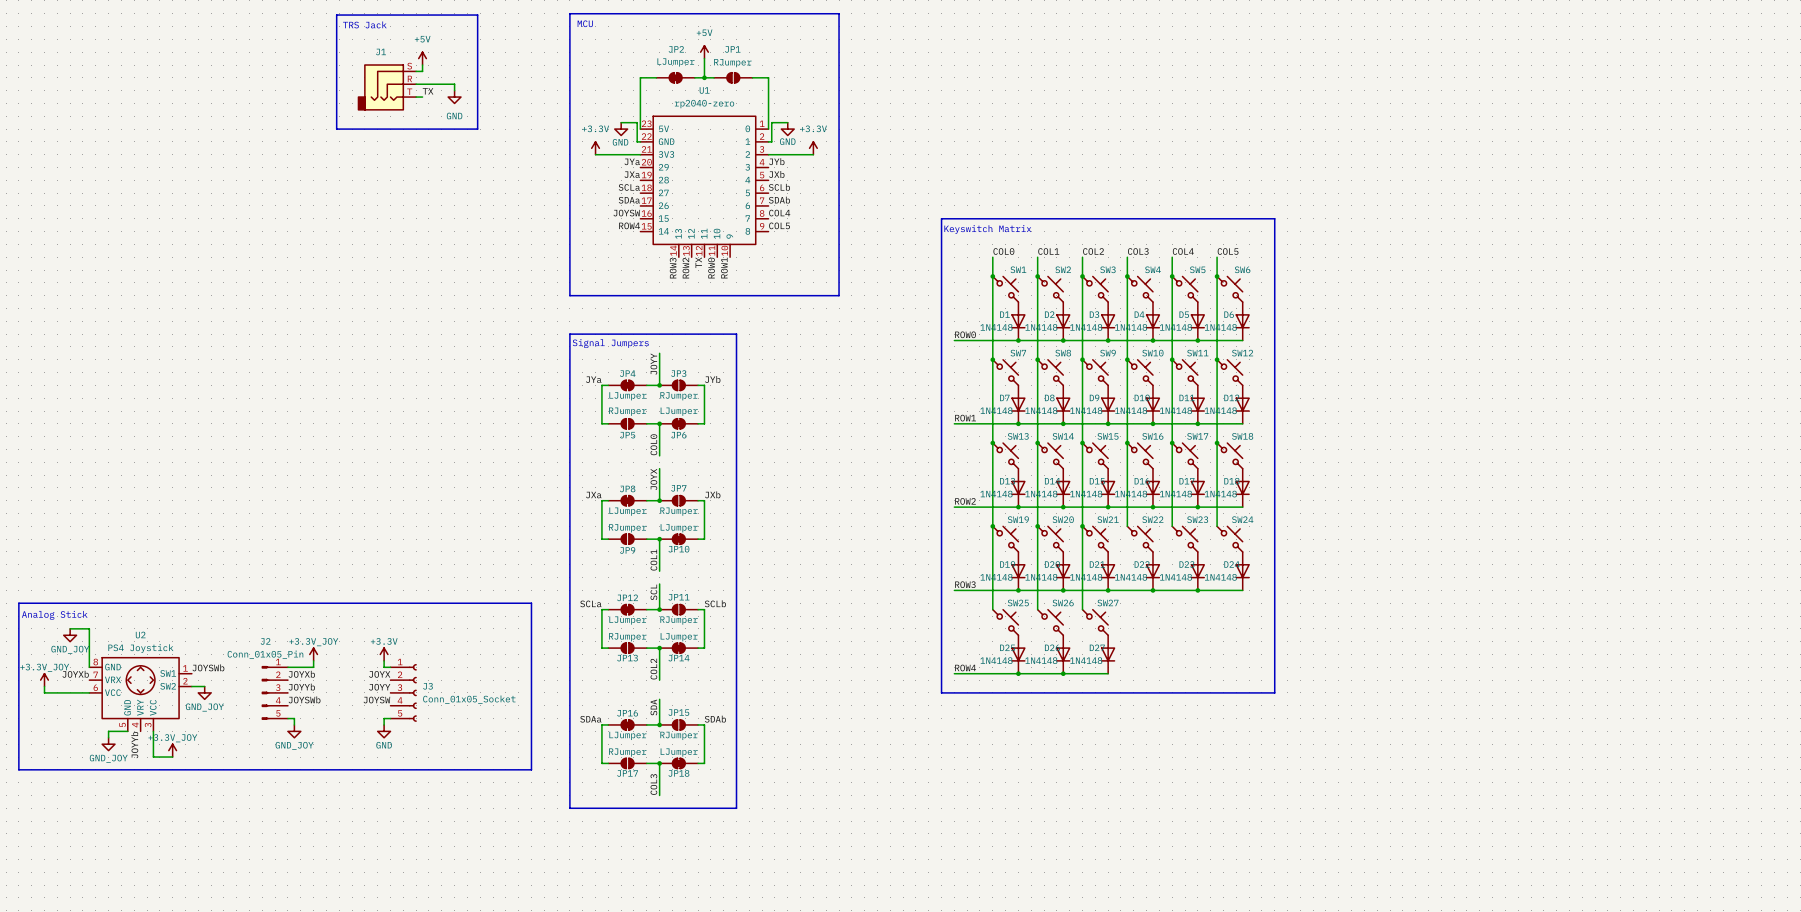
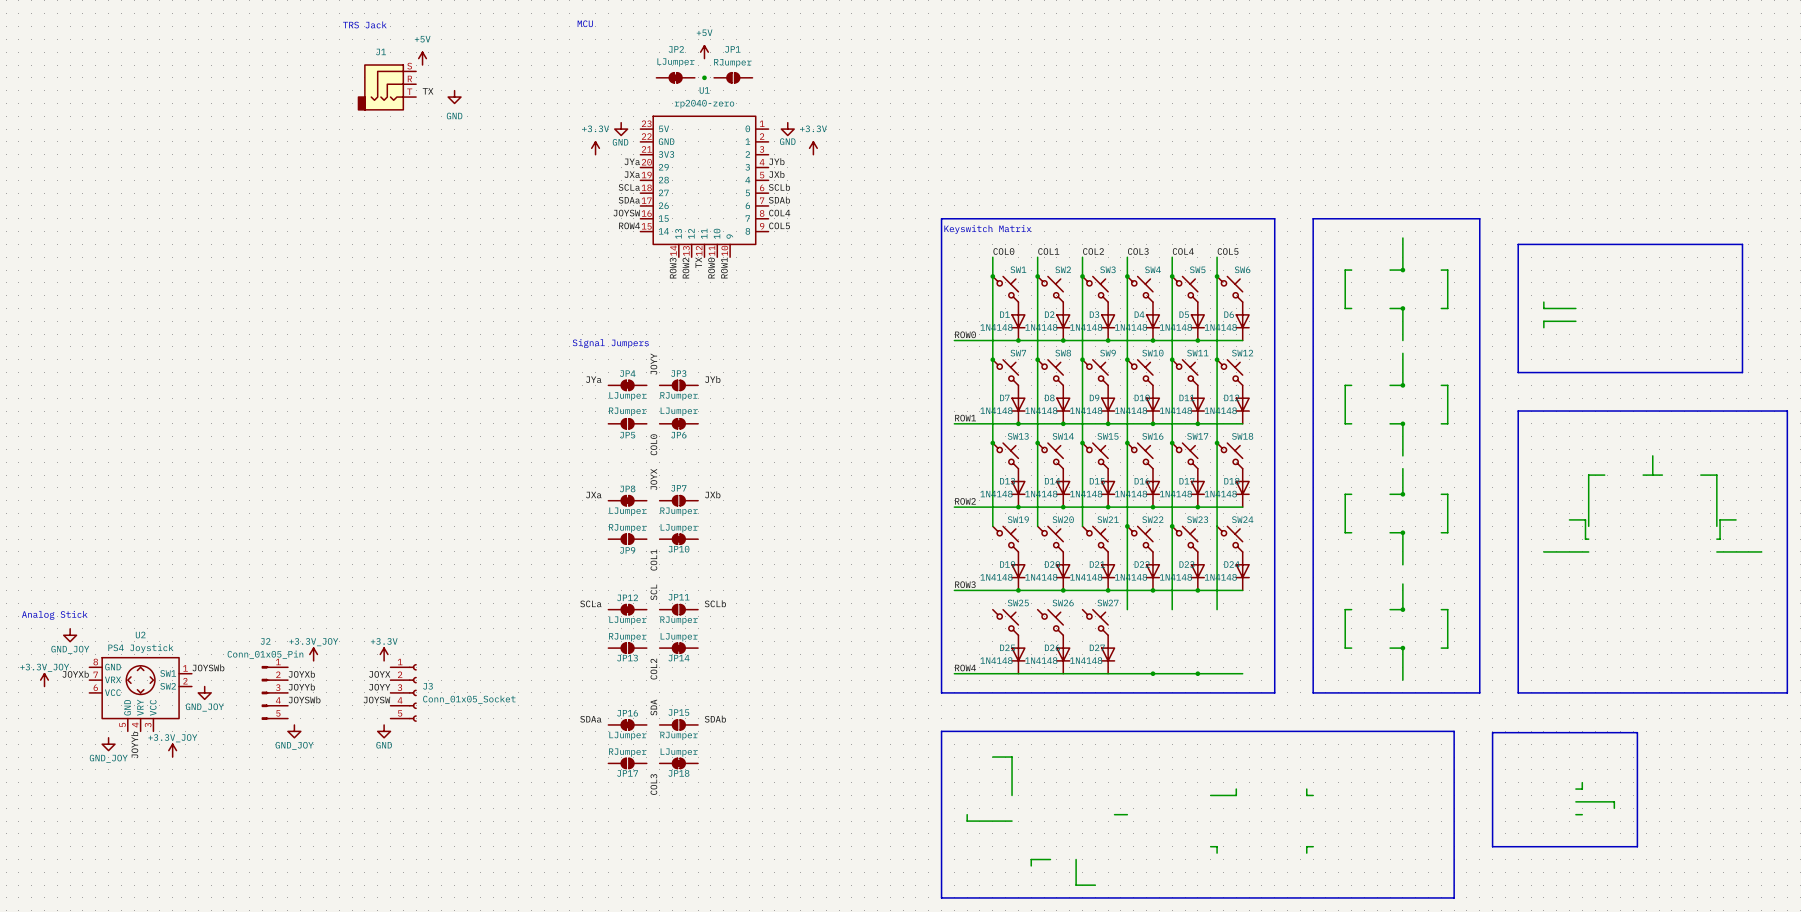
line: (569, 13) (569, 295) (839, 295) (839, 13) (569, 13) -> none
line: (336, 15) (477, 15) (477, 129) (336, 129) (336, 15) -> none
wire: (704, 58) (704, 77) -> none
wire: (422, 65) (422, 71) (416, 71) -> none
wire: (656, 77) (640, 77) (640, 129) -> none
wire: (694, 77) (714, 77) -> none
wire: (752, 77) (768, 77) (768, 129) -> none
wire: (416, 84) (454, 84) (454, 90) -> none
wire: (416, 97) (422, 97) -> none
wire: (621, 122) (637, 122) (637, 141) (640, 141) -> none
wire: (787, 122) (771, 122) (771, 141) (768, 141) -> none
wire: (595, 154) (640, 154) -> none
wire: (768, 154) (813, 154) -> none
line: none -> (1313, 218) (1479, 218) (1479, 692) (1313, 692) (1313, 218)
wire: none -> (1402, 238) (1402, 270) (1390, 270)
line: none -> (1518, 244) (1742, 244) (1742, 372) (1518, 372) (1518, 244)
wire: none -> (1351, 270) (1345, 270) (1345, 308) (1351, 308)
junction: none -> (1402, 270)
wire: none -> (1441, 270) (1447, 270) (1447, 308) (1441, 308)
wire: none -> (1543, 302) (1543, 308) (1575, 308)
wire: none -> (1390, 308) (1402, 308) (1402, 340)
junction: none -> (1402, 308)
wire: none -> (1575, 321) (1543, 321) (1543, 327)
line: (569, 334) (736, 334) (736, 808) (569, 808) (569, 334) -> none
wire: (659, 353) (659, 385) (646, 385) -> none
wire: none -> (1402, 353) (1402, 385) (1390, 385)
wire: (608, 385) (601, 385) (601, 423) (608, 423) -> none
junction: (659, 385) -> none
wire: (698, 385) (704, 385) (704, 423) (698, 423) -> none
wire: none -> (1351, 385) (1345, 385) (1345, 423) (1351, 423)
junction: none -> (1402, 385)
wire: none -> (1441, 385) (1447, 385) (1447, 423) (1441, 423)
line: none -> (1518, 411) (1518, 692) (1787, 692) (1787, 411) (1518, 411)
wire: (646, 423) (659, 423) (659, 455) -> none
junction: (659, 423) -> none
wire: none -> (1390, 423) (1402, 423) (1402, 455)
junction: none -> (1402, 423)
wire: none -> (1652, 455) (1652, 475)
wire: (659, 468) (659, 500) (646, 500) -> none
wire: none -> (1402, 468) (1402, 494) (1390, 494)
wire: none -> (1604, 475) (1588, 475) (1588, 526)
wire: none -> (1643, 475) (1662, 475)
wire: none -> (1700, 475) (1716, 475) (1716, 526)
wire: none -> (1351, 494) (1345, 494) (1345, 532) (1351, 532)
junction: none -> (1402, 494)
wire: none -> (1441, 494) (1447, 494) (1447, 532) (1441, 532)
wire: (608, 500) (601, 500) (601, 539) (608, 539) -> none
junction: (659, 500) -> none
wire: (698, 500) (704, 500) (704, 539) (698, 539) -> none
wire: none -> (1569, 519) (1585, 519) (1585, 539) (1588, 539)
wire: none -> (1736, 519) (1720, 519) (1720, 539) (1716, 539)
wire: (992, 526) (992, 609) -> none
junction: (992, 526) -> none
wire: (1037, 526) (1037, 609) -> (1127, 526) (1127, 609)
junction: (1037, 526) -> none
wire: (1082, 526) (1082, 609) -> (1172, 526) (1172, 609)
junction: (1082, 526) -> none
junction: none -> (1127, 526)
junction: none -> (1172, 526)
wire: none -> (1217, 526) (1217, 609)
wire: none -> (1390, 532) (1402, 532) (1402, 564)
junction: none -> (1402, 532)
wire: (646, 539) (659, 539) (659, 571) -> none
junction: (659, 539) -> none
wire: none -> (1543, 551) (1588, 551)
wire: none -> (1716, 551) (1761, 551)
wire: (659, 584) (659, 609) (646, 609) -> none
wire: none -> (1402, 584) (1402, 609) (1390, 609)
line: (18, 603) (531, 603) (531, 769) (18, 769) (18, 603) -> none
wire: (608, 609) (601, 609) (601, 648) (608, 648) -> none
junction: (659, 609) -> none
wire: (698, 609) (704, 609) (704, 648) (698, 648) -> none
wire: none -> (1351, 609) (1345, 609) (1345, 648) (1351, 648)
junction: none -> (1402, 609)
wire: none -> (1441, 609) (1447, 609) (1447, 648) (1441, 648)
wire: (70, 628) (89, 628) (89, 667) -> none
wire: (646, 648) (659, 648) (659, 680) -> none
junction: (659, 648) -> none
wire: none -> (1390, 648) (1402, 648) (1402, 680)
junction: none -> (1402, 648)
wire: (313, 660) (313, 667) (287, 667) -> none
wire: (384, 660) (384, 667) (390, 667) -> none
junction: (1018, 673) -> none
junction: (1063, 673) -> none
wire: none -> (1108, 673) (1242, 673)
junction: none -> (1152, 673)
junction: none -> (1197, 673)
wire: (44, 686) (44, 692) (89, 692) -> none
wire: (191, 686) (204, 686) -> none
wire: (659, 699) (659, 724) (646, 724) -> none
wire: (287, 718) (294, 718) (294, 724) -> none
wire: (390, 718) (384, 718) (384, 724) -> none
wire: (608, 724) (601, 724) (601, 763) (608, 763) -> none
junction: (659, 724) -> none
wire: (698, 724) (704, 724) (704, 763) (698, 763) -> none
wire: (127, 731) (108, 731) (108, 737) -> none
wire: (153, 731) (153, 757) (172, 757) -> none
line: none -> (941, 731) (1454, 731) (1454, 897) (941, 897) (941, 731)
line: none -> (1492, 732) (1637, 732) (1637, 846) (1492, 846) (1492, 732)
wire: none -> (992, 757) (1012, 757) (1012, 795)
wire: (646, 763) (659, 763) (659, 795) -> none
junction: (659, 763) -> none
wire: none -> (1582, 782) (1582, 789) (1575, 789)
wire: none -> (1236, 789) (1236, 795) (1210, 795)
wire: none -> (1306, 789) (1306, 795) (1313, 795)
wire: none -> (1575, 801) (1614, 801) (1614, 808)
wire: none -> (967, 814) (967, 821) (1012, 821)
wire: none -> (1114, 814) (1127, 814)
wire: none -> (1575, 814) (1582, 814)
wire: none -> (1210, 846) (1217, 846) (1217, 853)
wire: none -> (1313, 846) (1306, 846) (1306, 853)
wire: none -> (1050, 859) (1031, 859) (1031, 865)
wire: none -> (1076, 859) (1076, 885) (1095, 885)

